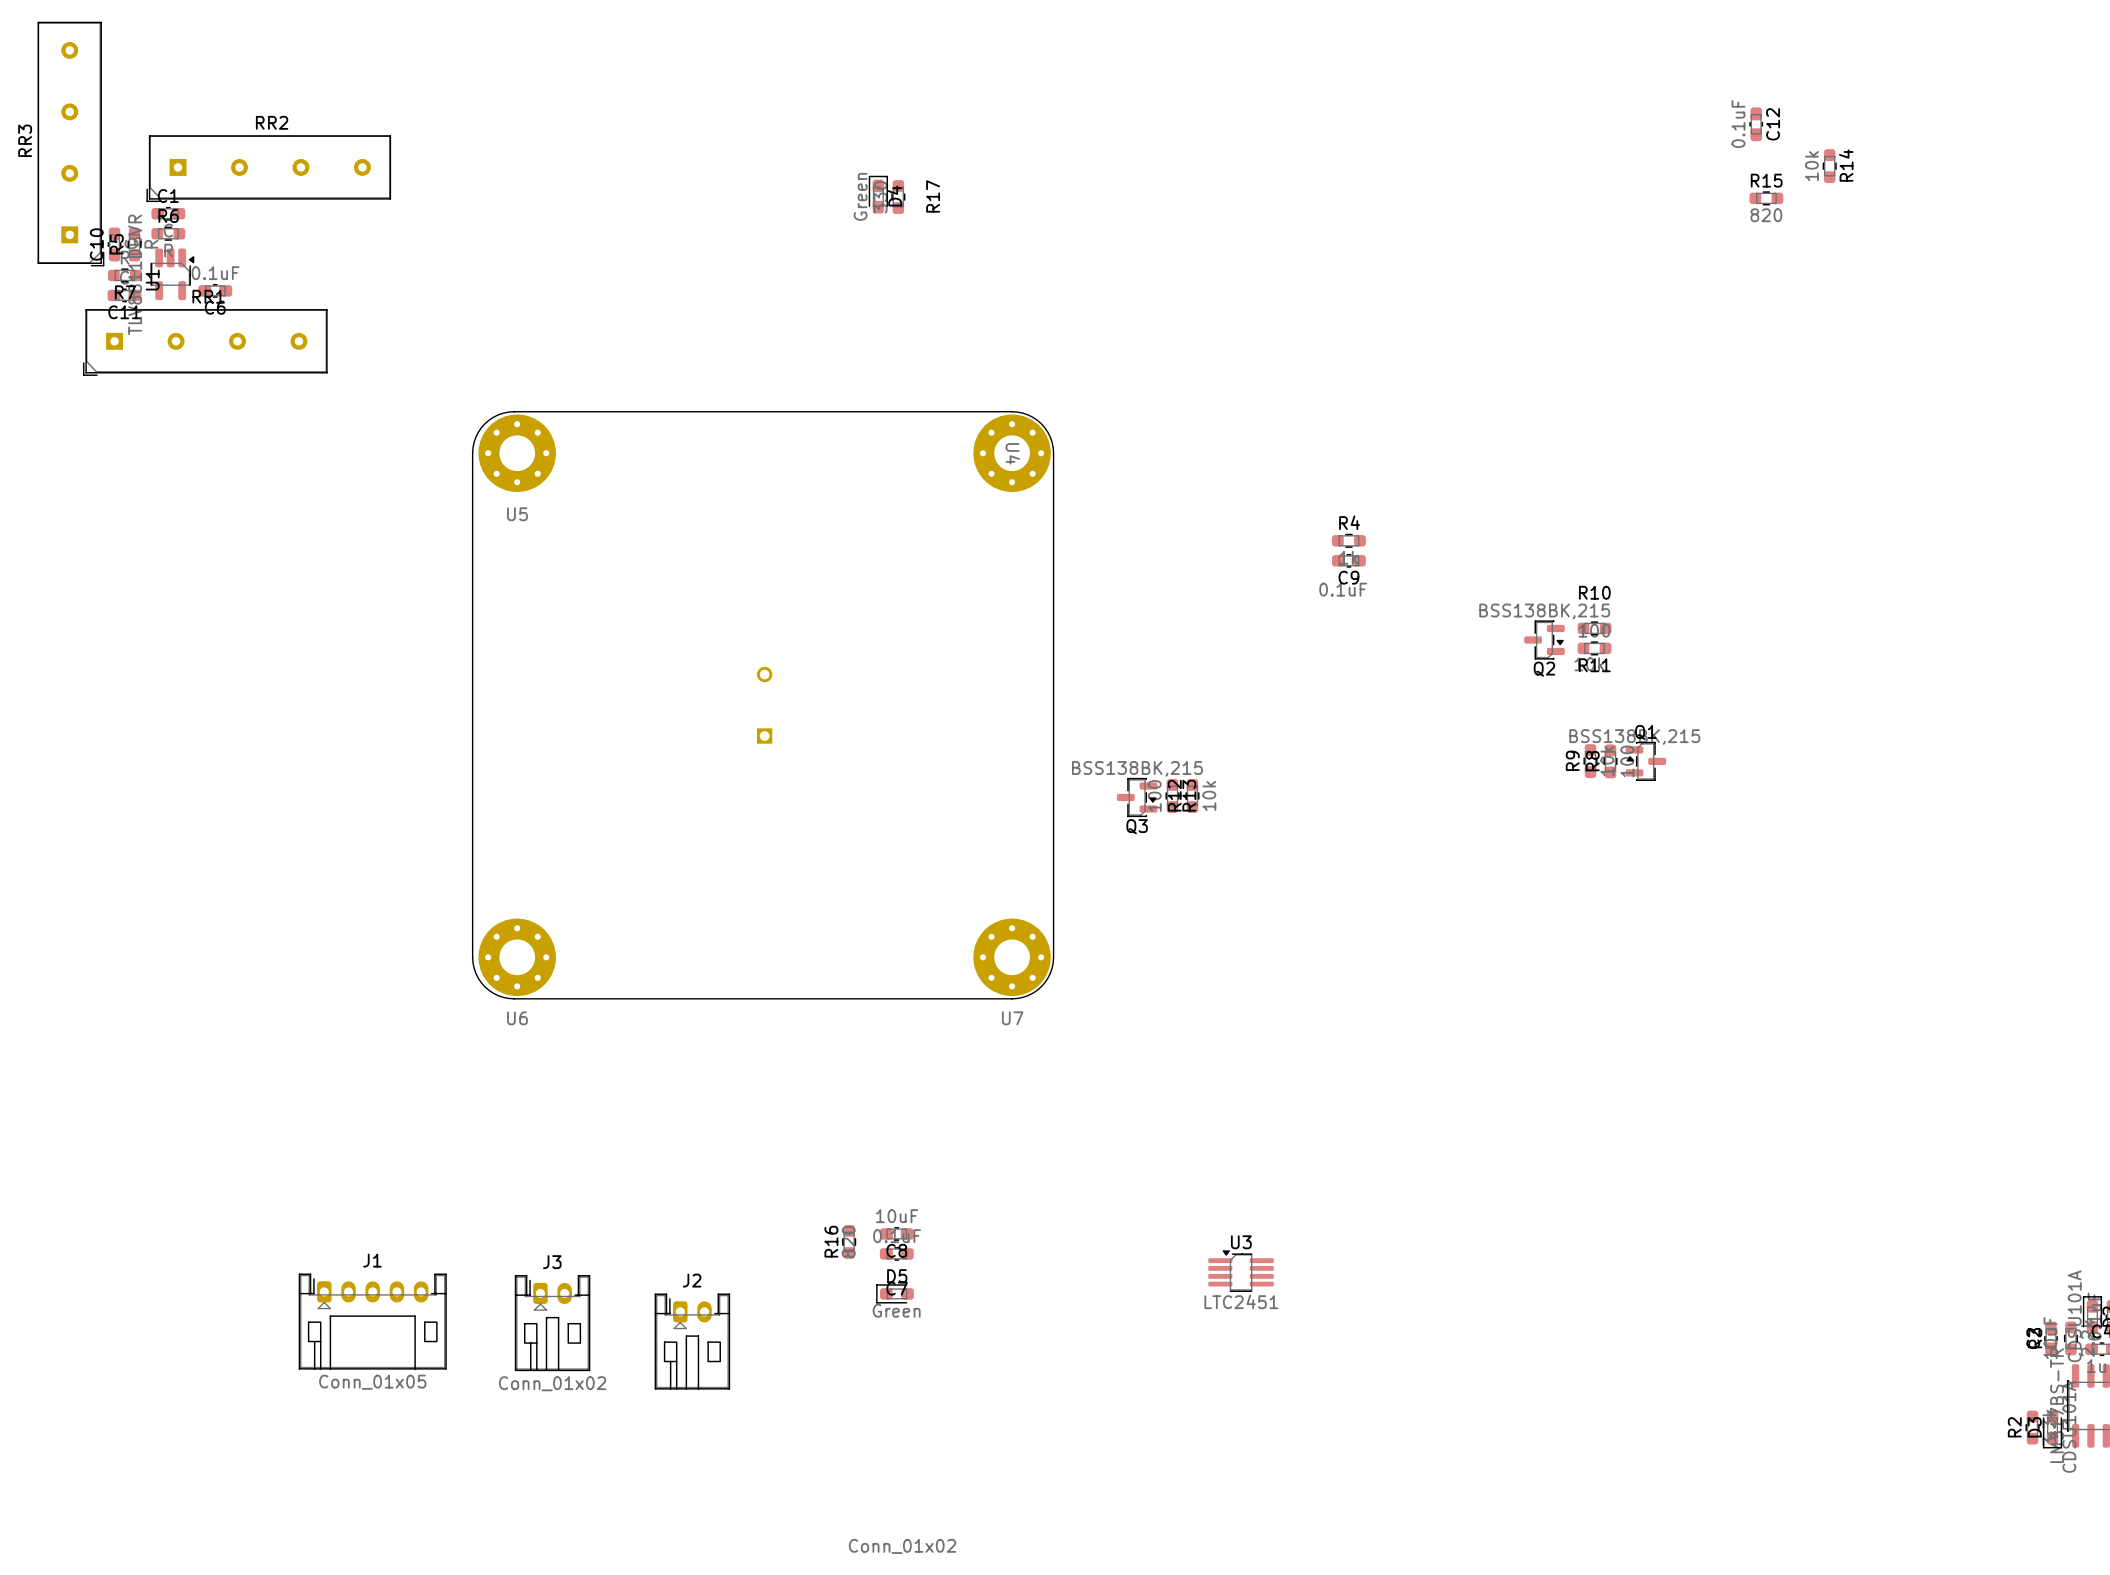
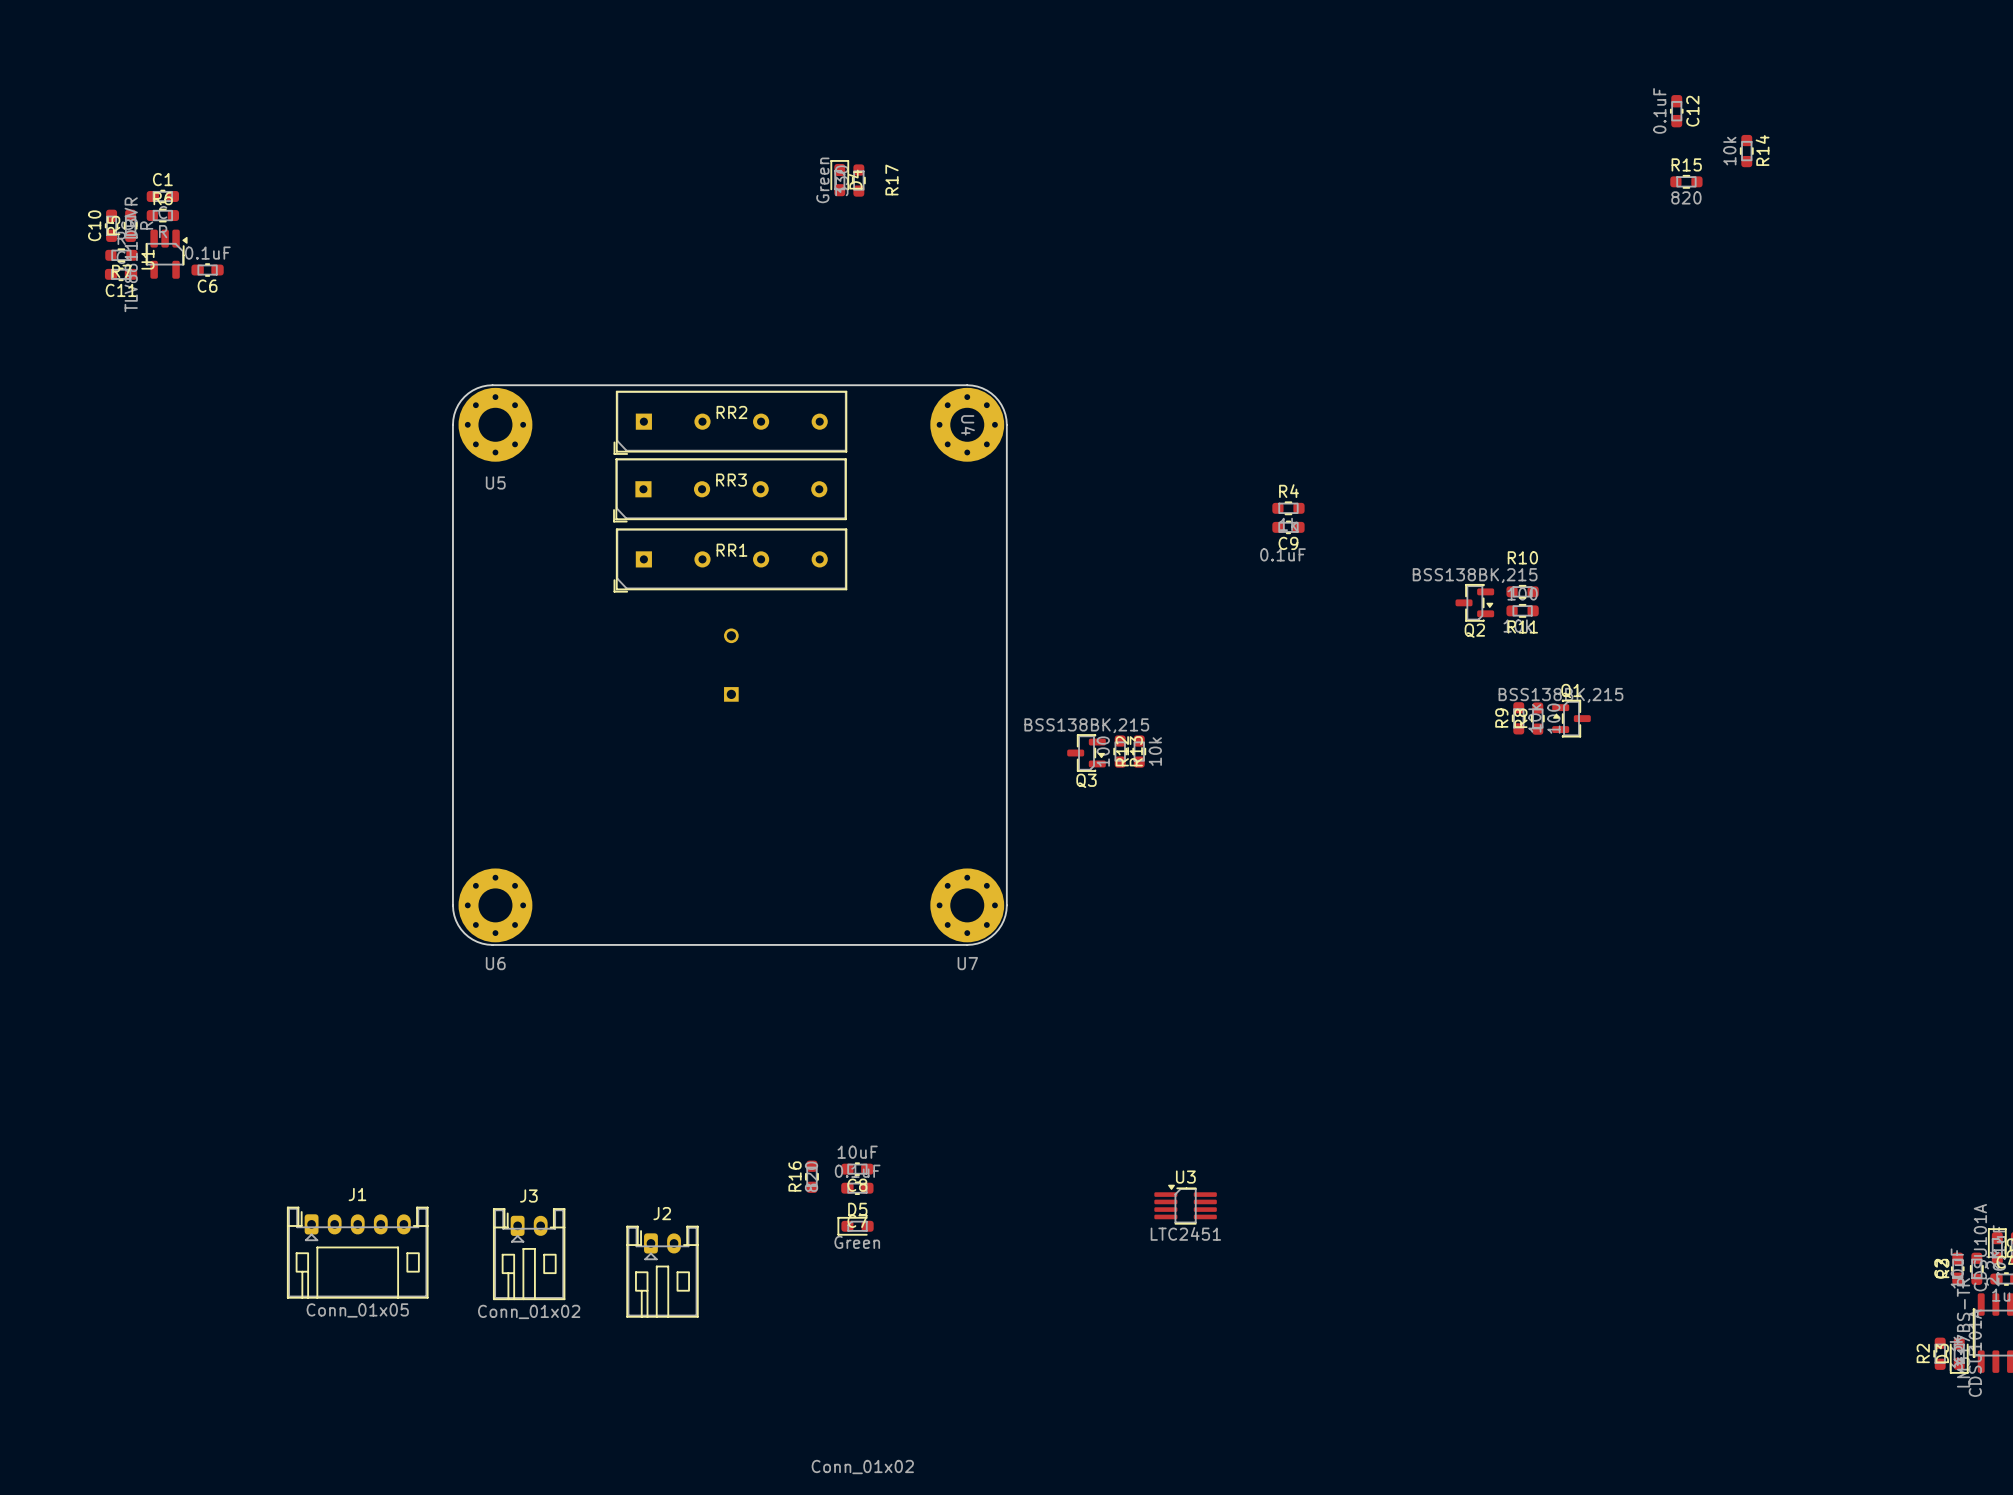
RR2 name position: RR2 (272, 122) -> RR2 (731, 412)
RR3 name position: RR3 (25, 140) -> RR3 (731, 480)
RR3 rotation: 0° (70, 144) -> 90° clockwise (729, 490)
RR3 position: (70, 144) -> (729, 490)
RR2 position: (268, 168) -> (730, 422)
RR1 name position: RR1 (208, 296) -> RR1 (731, 550)
RR1 position: (205, 342) -> (730, 560)

